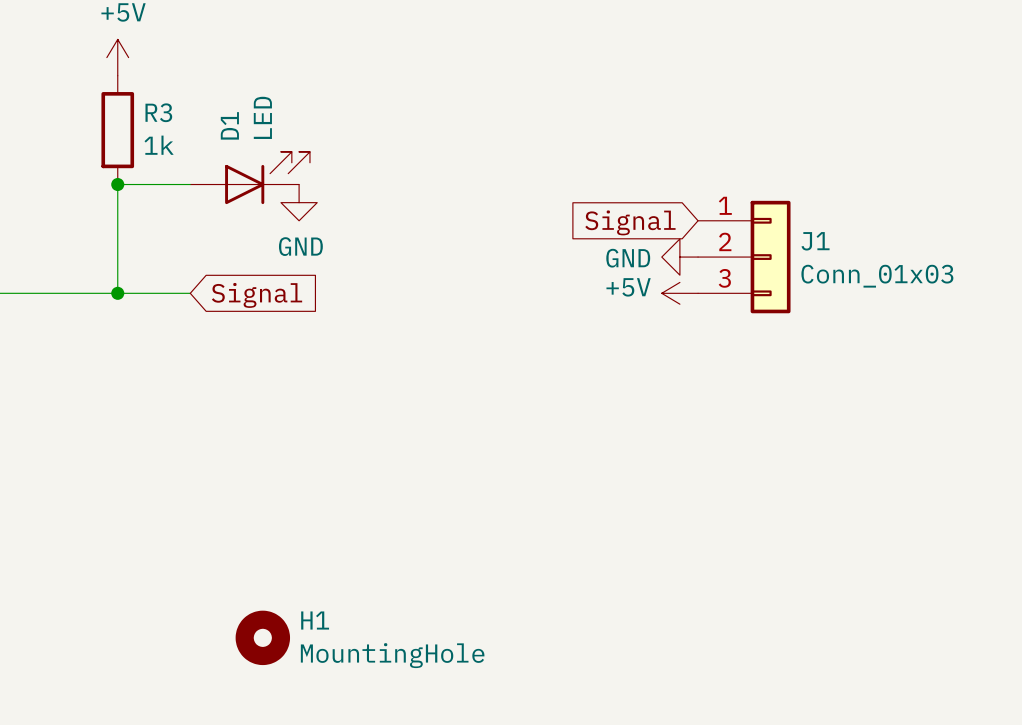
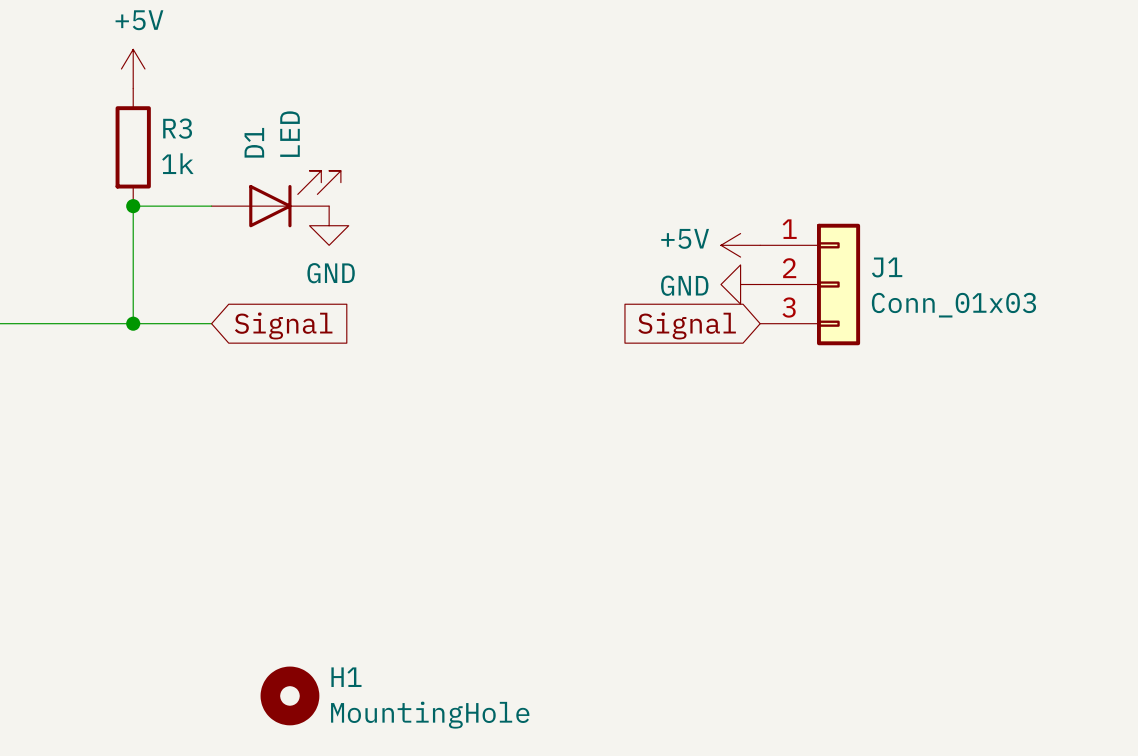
global label position: Signal (630, 222) -> Signal (687, 325)
power symbol position: +5V (679, 293) -> +5V (740, 245)

